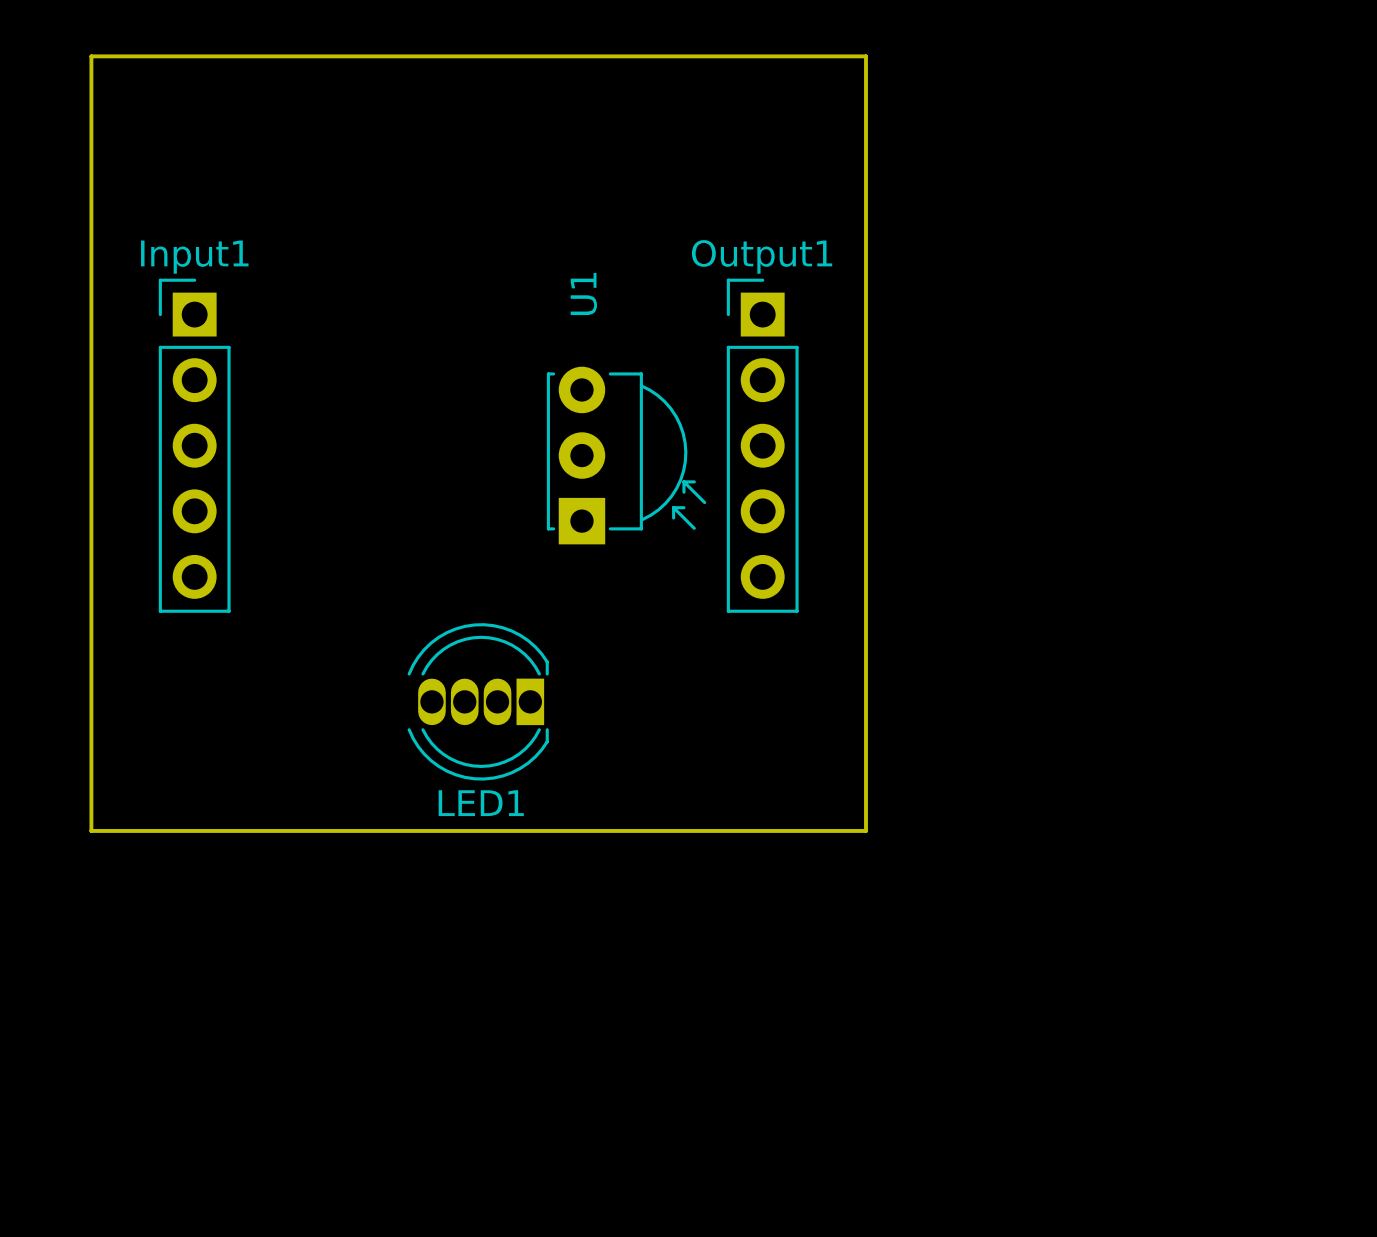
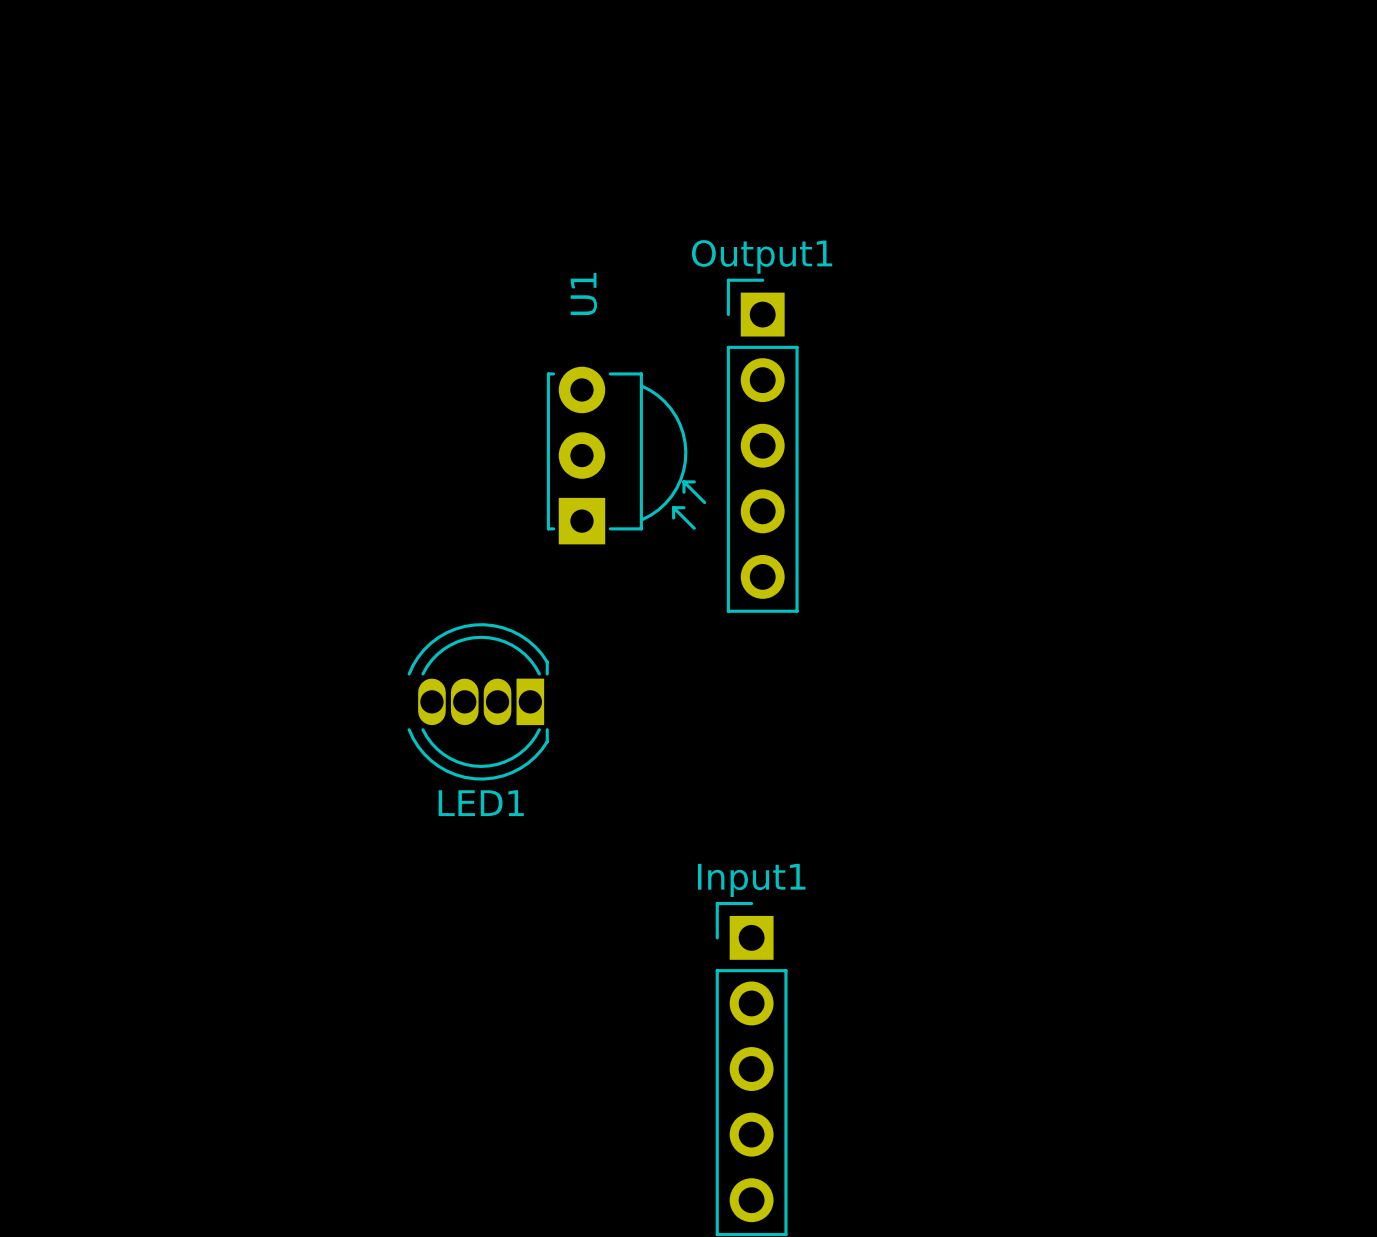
board edge: (91, 56) (865, 56) (865, 830) (91, 830) (91, 56) -> none
Input1 position: (194, 445) -> (751, 1069)

